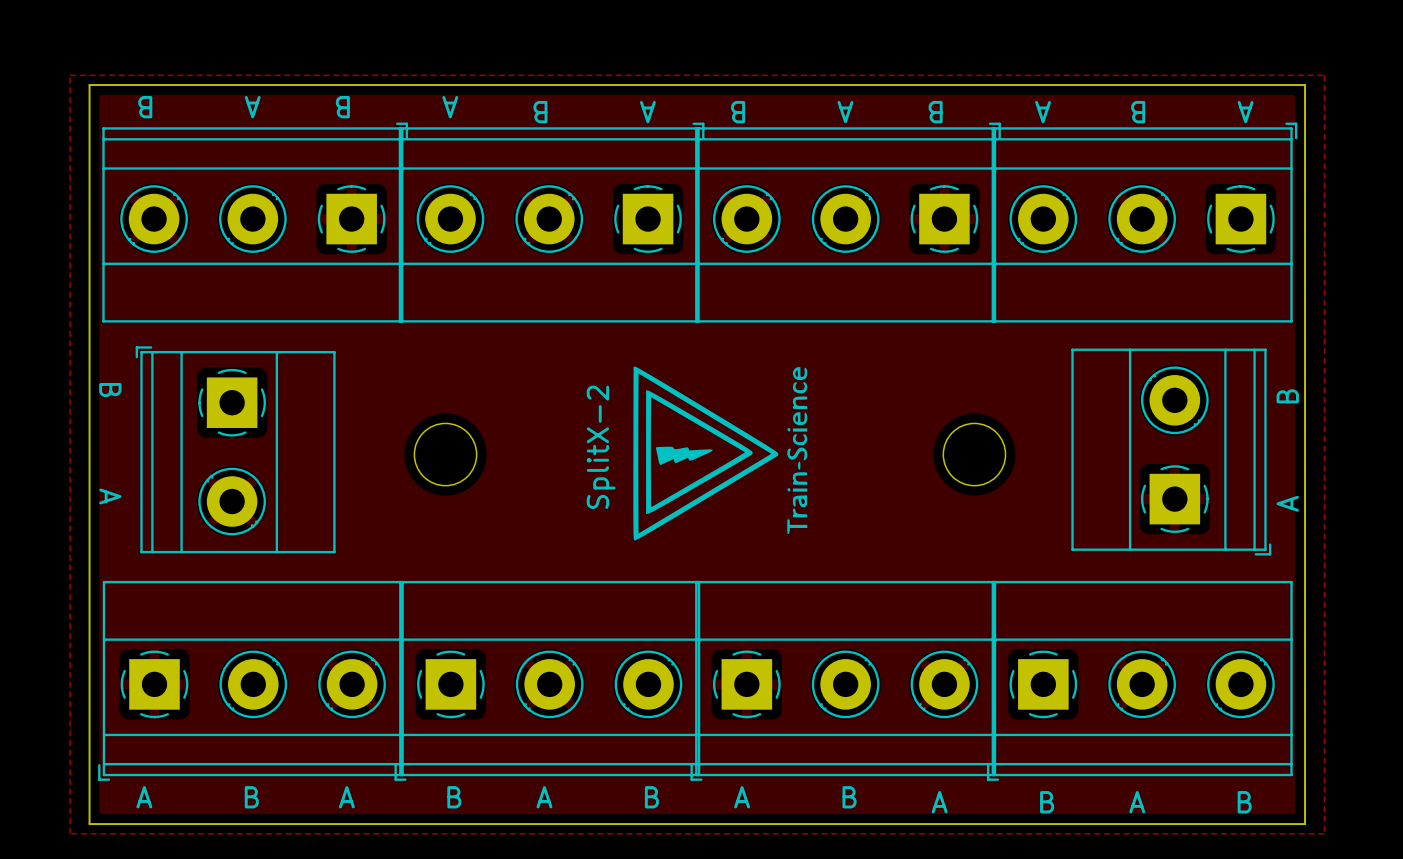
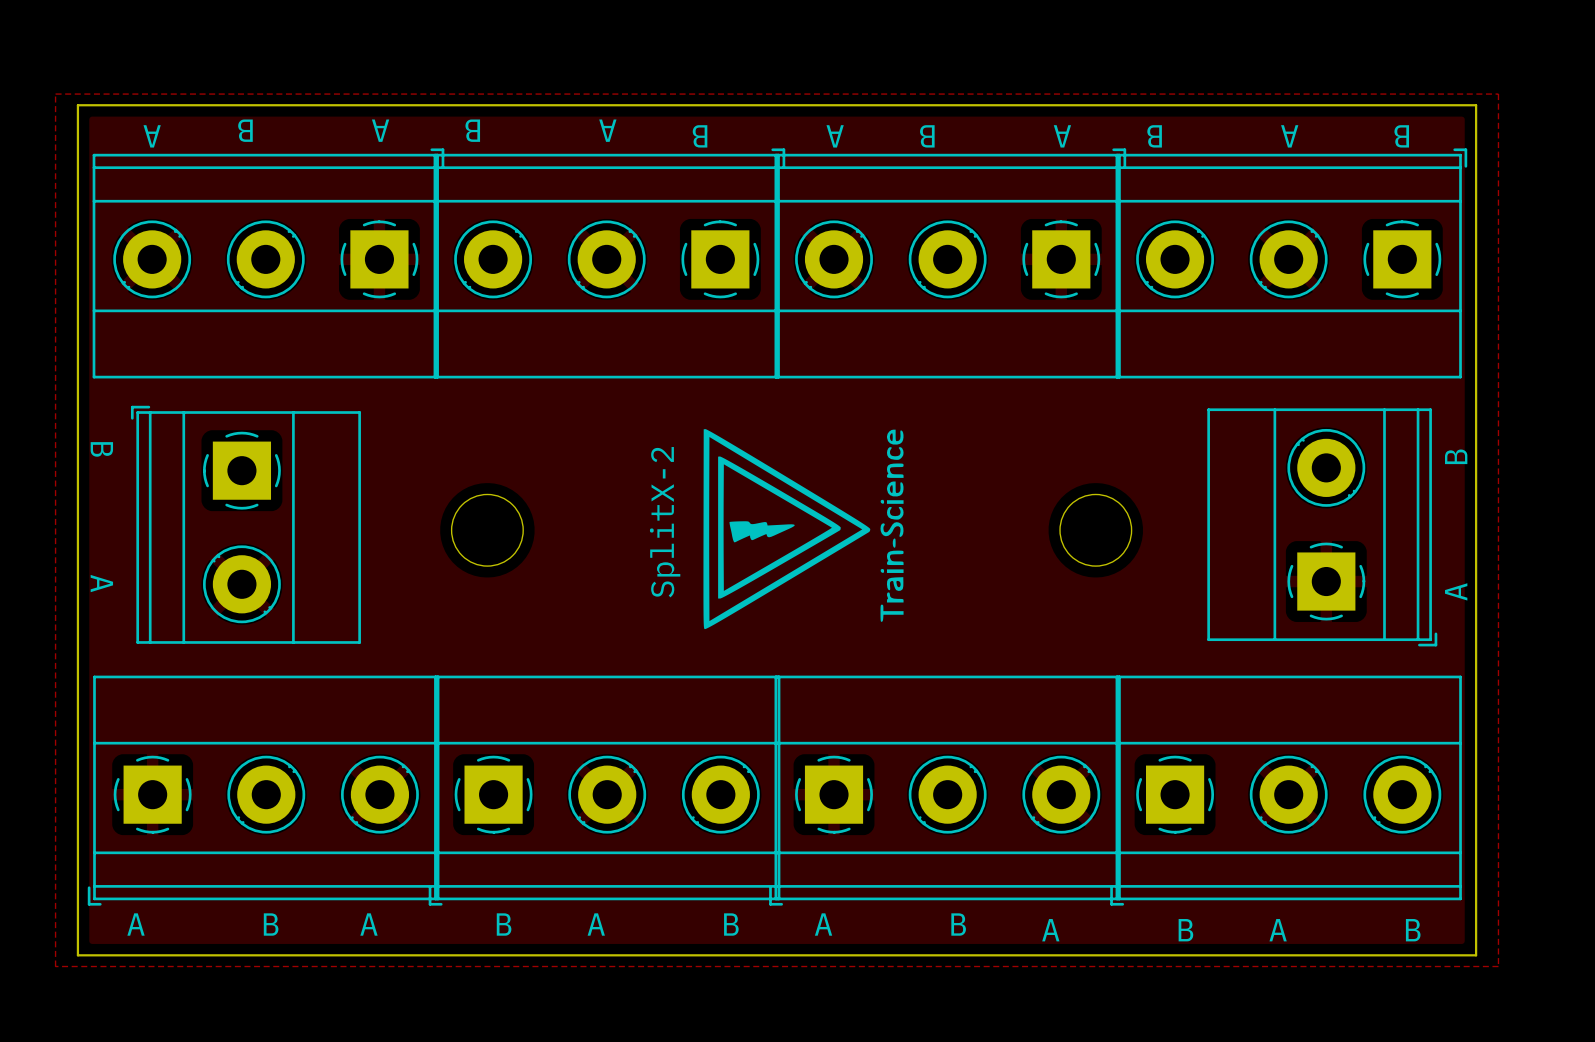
text: A B (199, 107) -> none
text: none -> A B (313, 130)
text: A B (397, 107) -> none
text: none -> A B (540, 130)
text: none -> A (152, 136)
text: A B (594, 112) -> none
text: none -> A B (768, 136)
text: A B (792, 112) -> none
text: none -> A B (995, 136)
text: A B (989, 112) -> none
text: none -> A B (1222, 136)
text: A B (1192, 112) -> none
text: none -> B (1401, 136)

